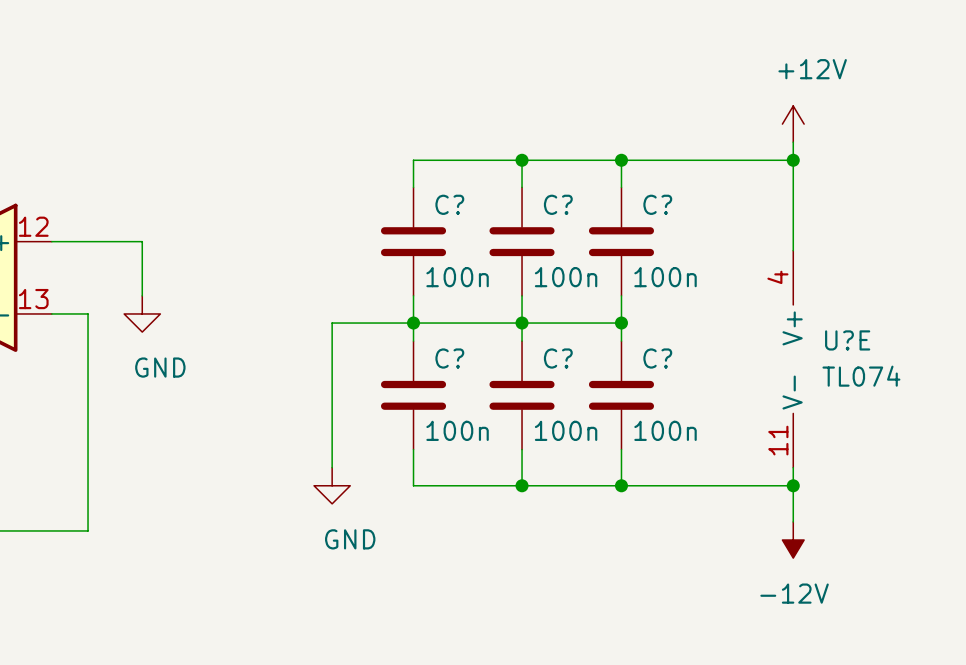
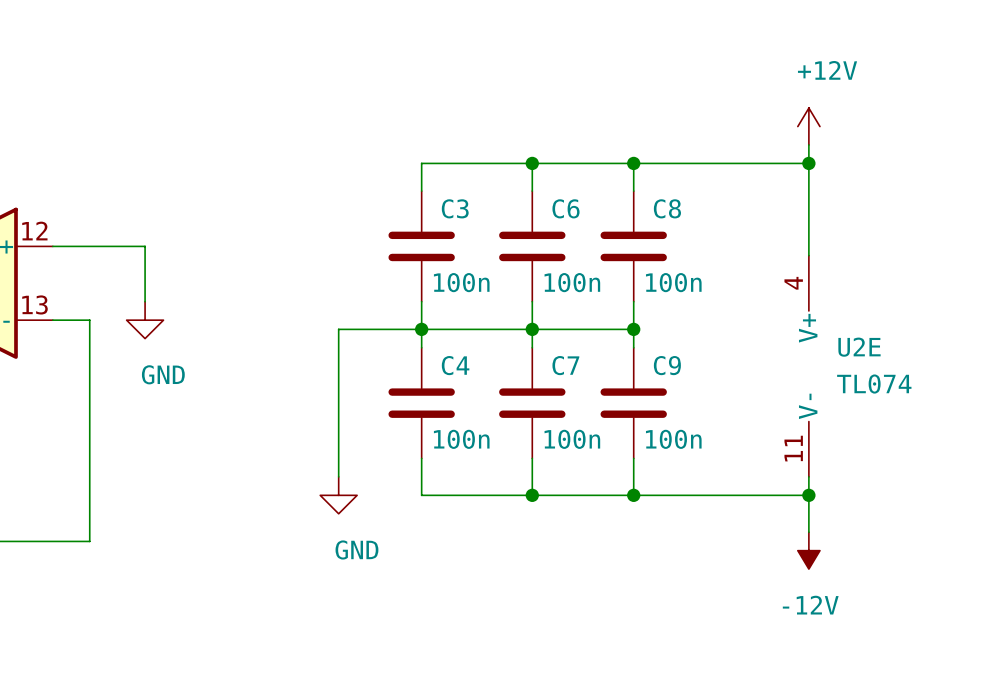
C? name: C? (449, 204) -> C3 (455, 208)
C? name: C? (558, 204) -> C6 (566, 208)
C? name: C? (657, 204) -> C8 (667, 208)
U?E name: U?E (847, 340) -> U2E (859, 347)
C? name: C? (449, 358) -> C4 (455, 365)
C? name: C? (558, 358) -> C7 (565, 365)
C? name: C? (657, 358) -> C9 (667, 365)

